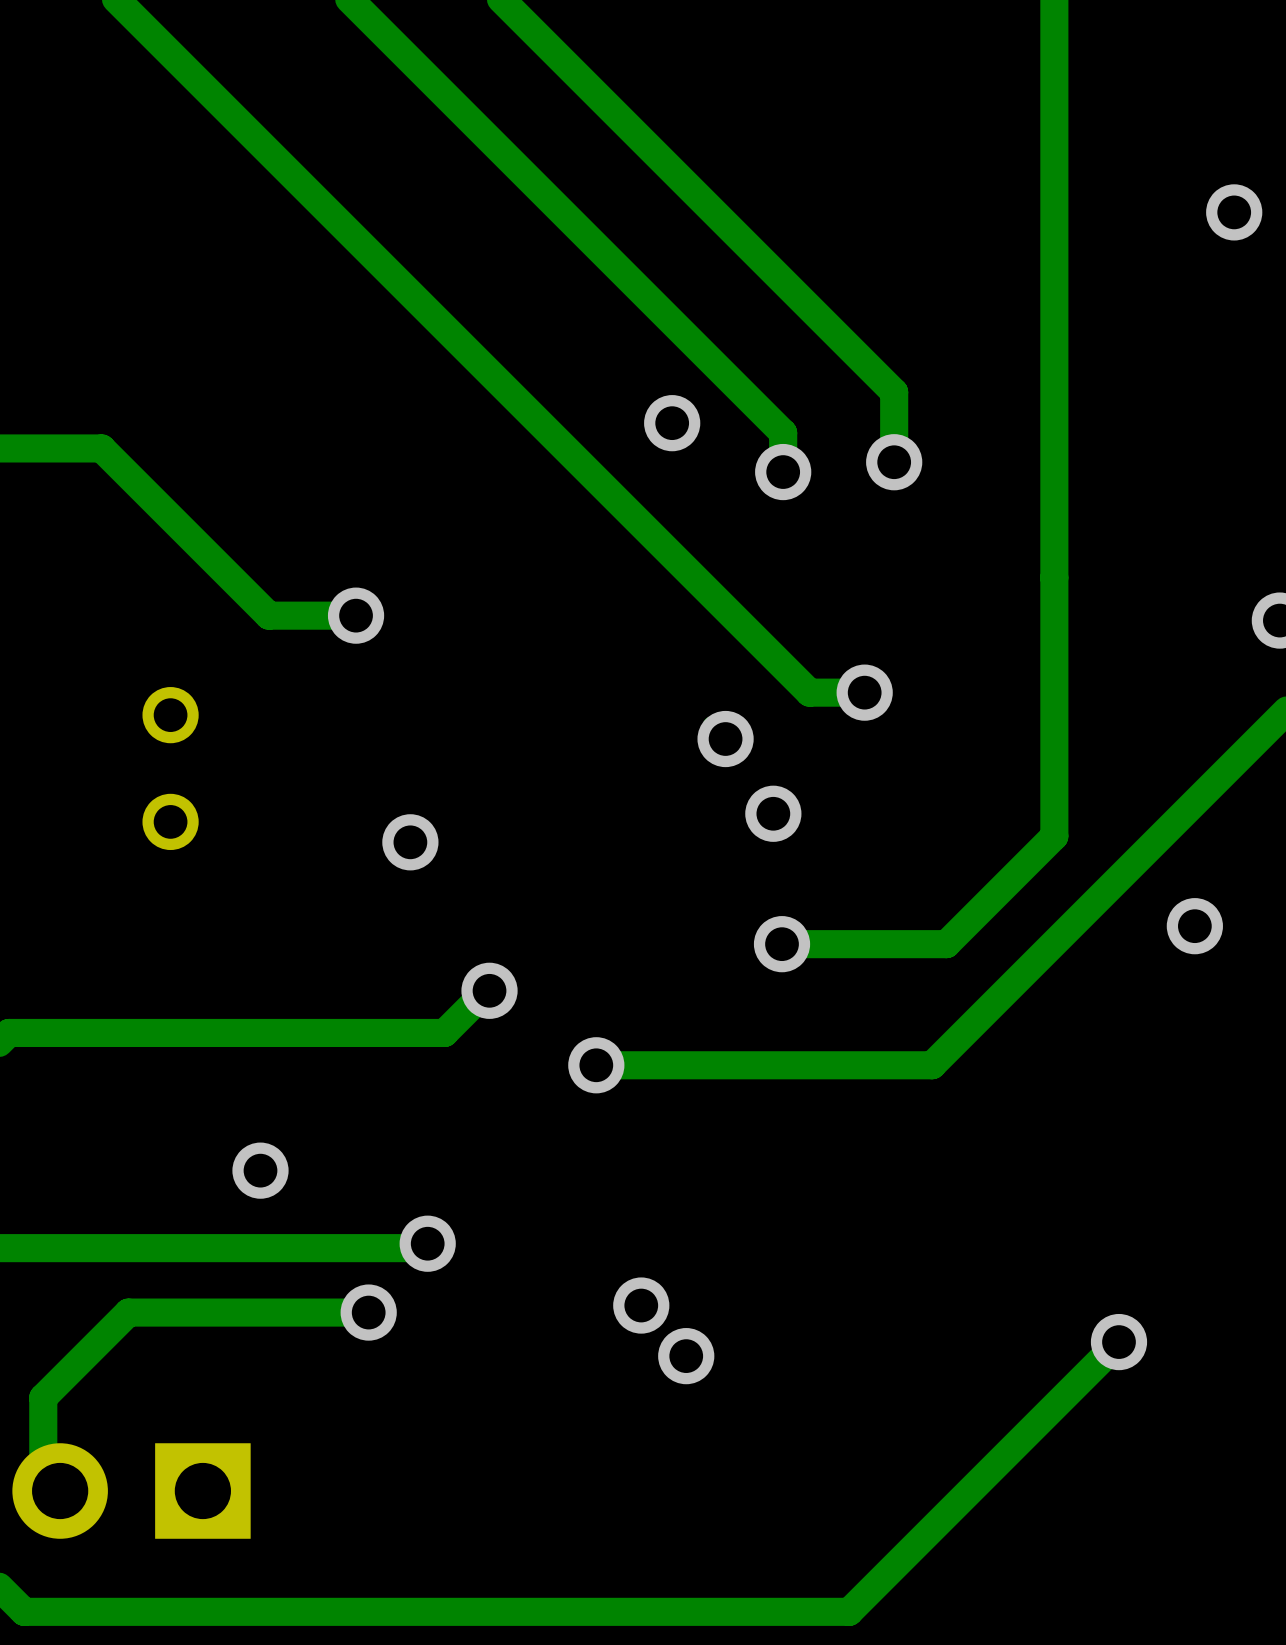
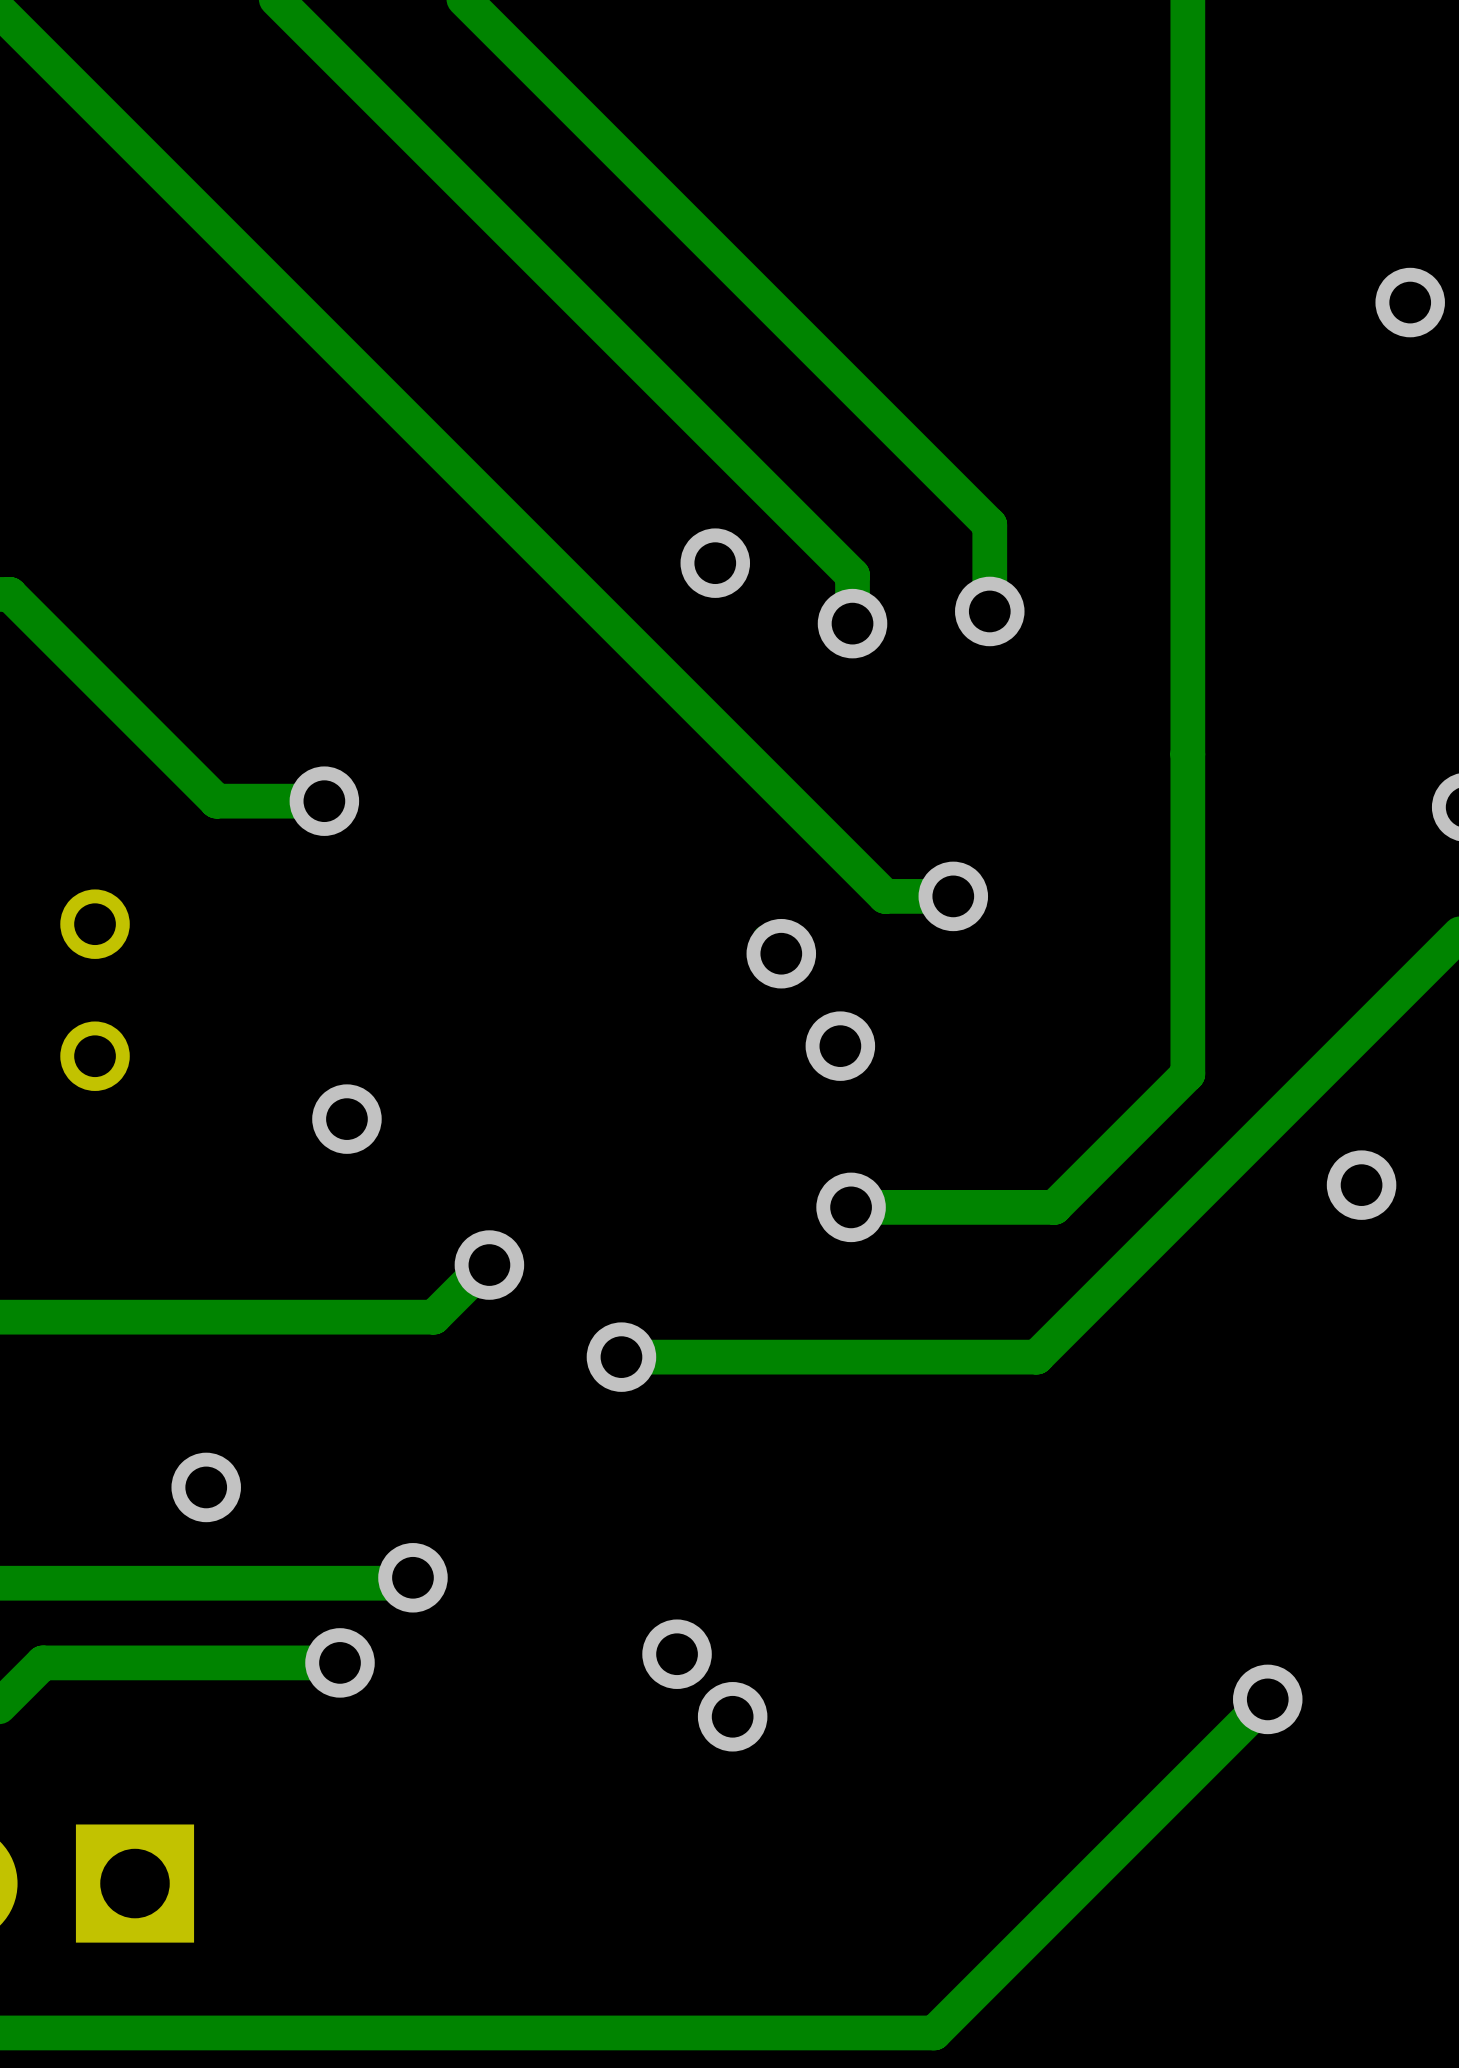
via position: (410, 842) -> (346, 1119)

